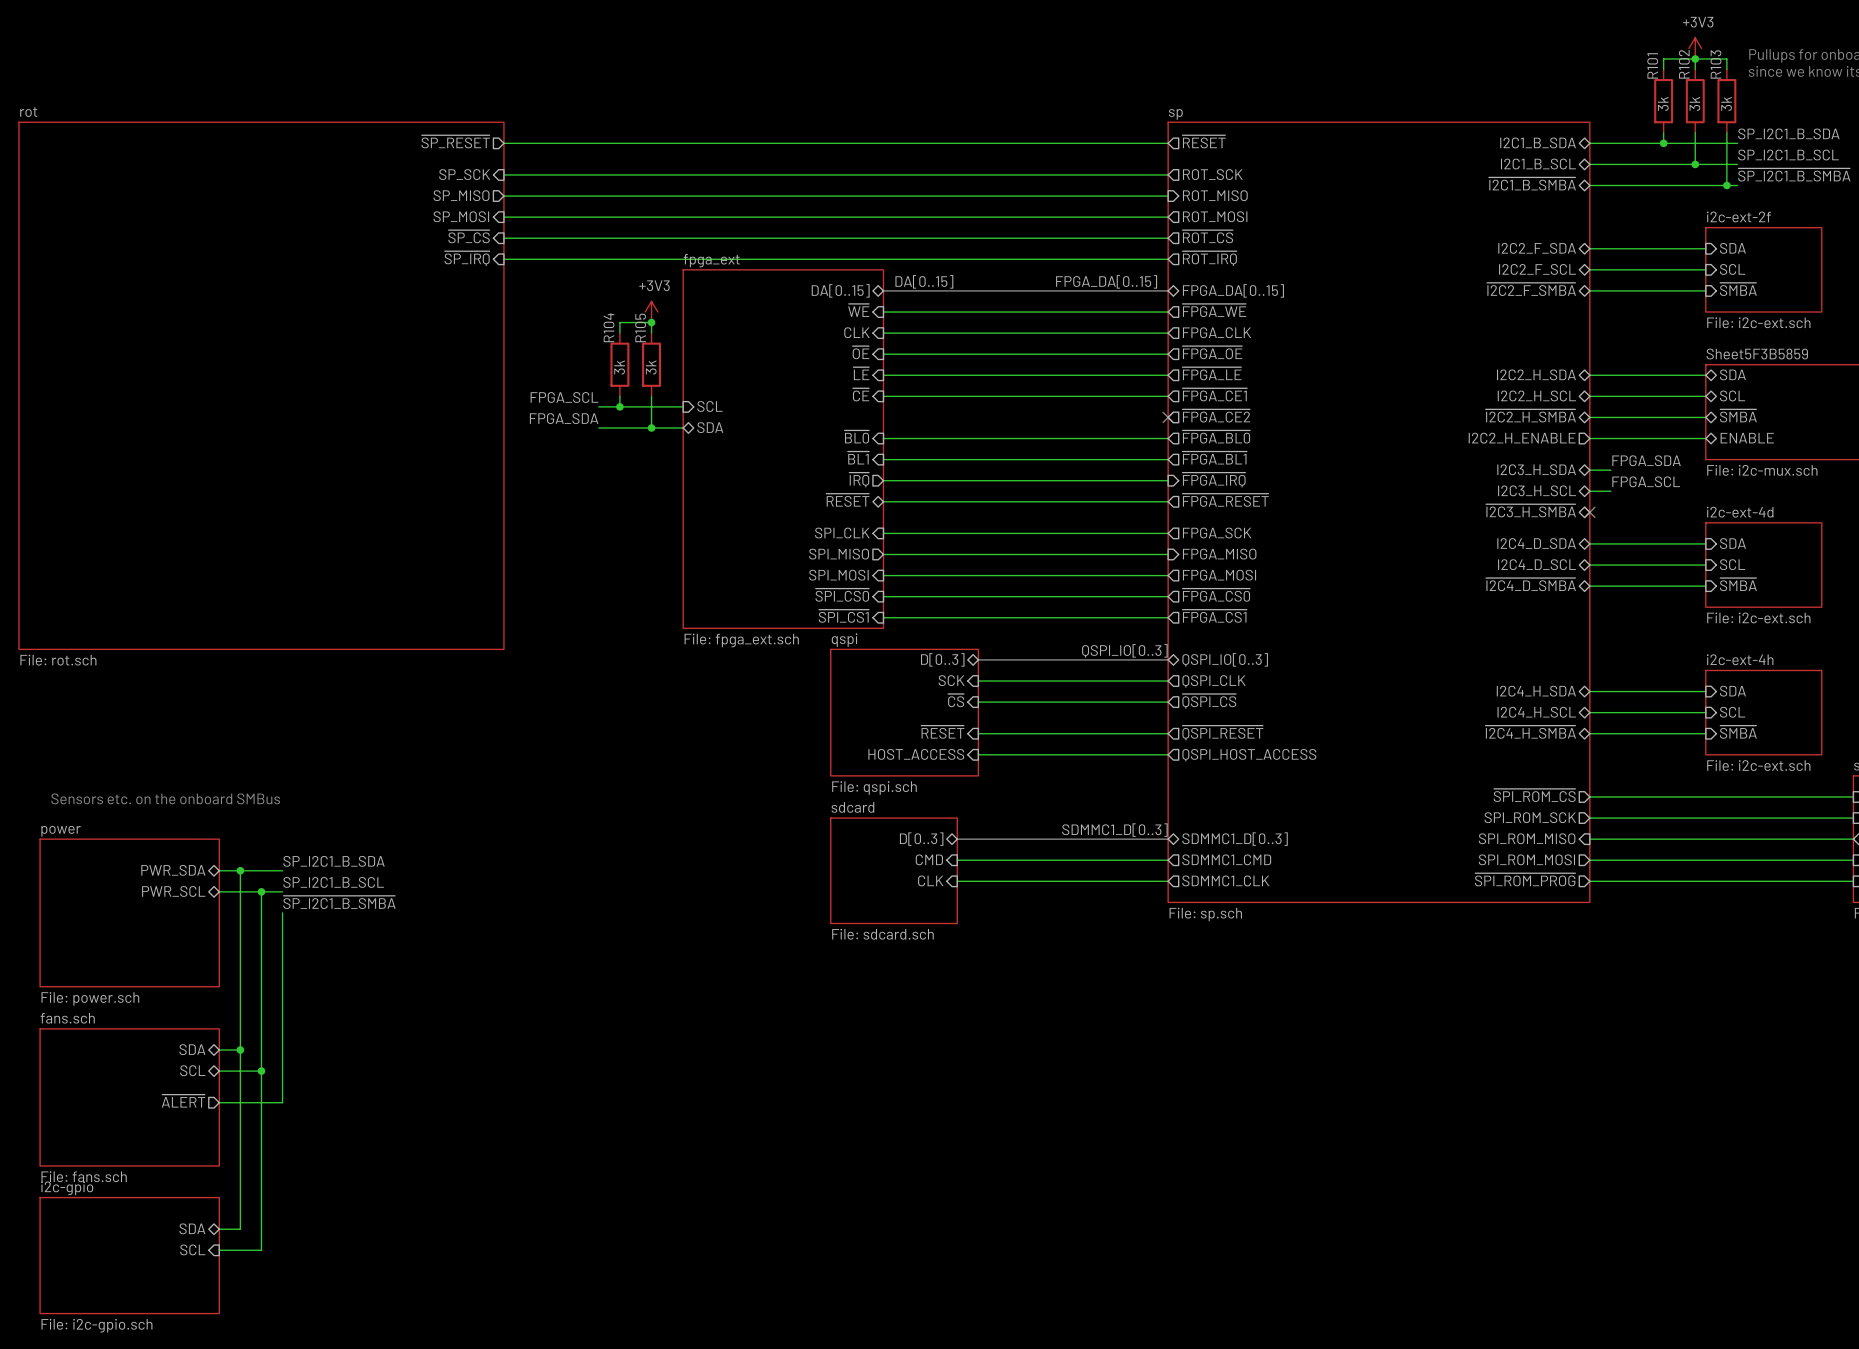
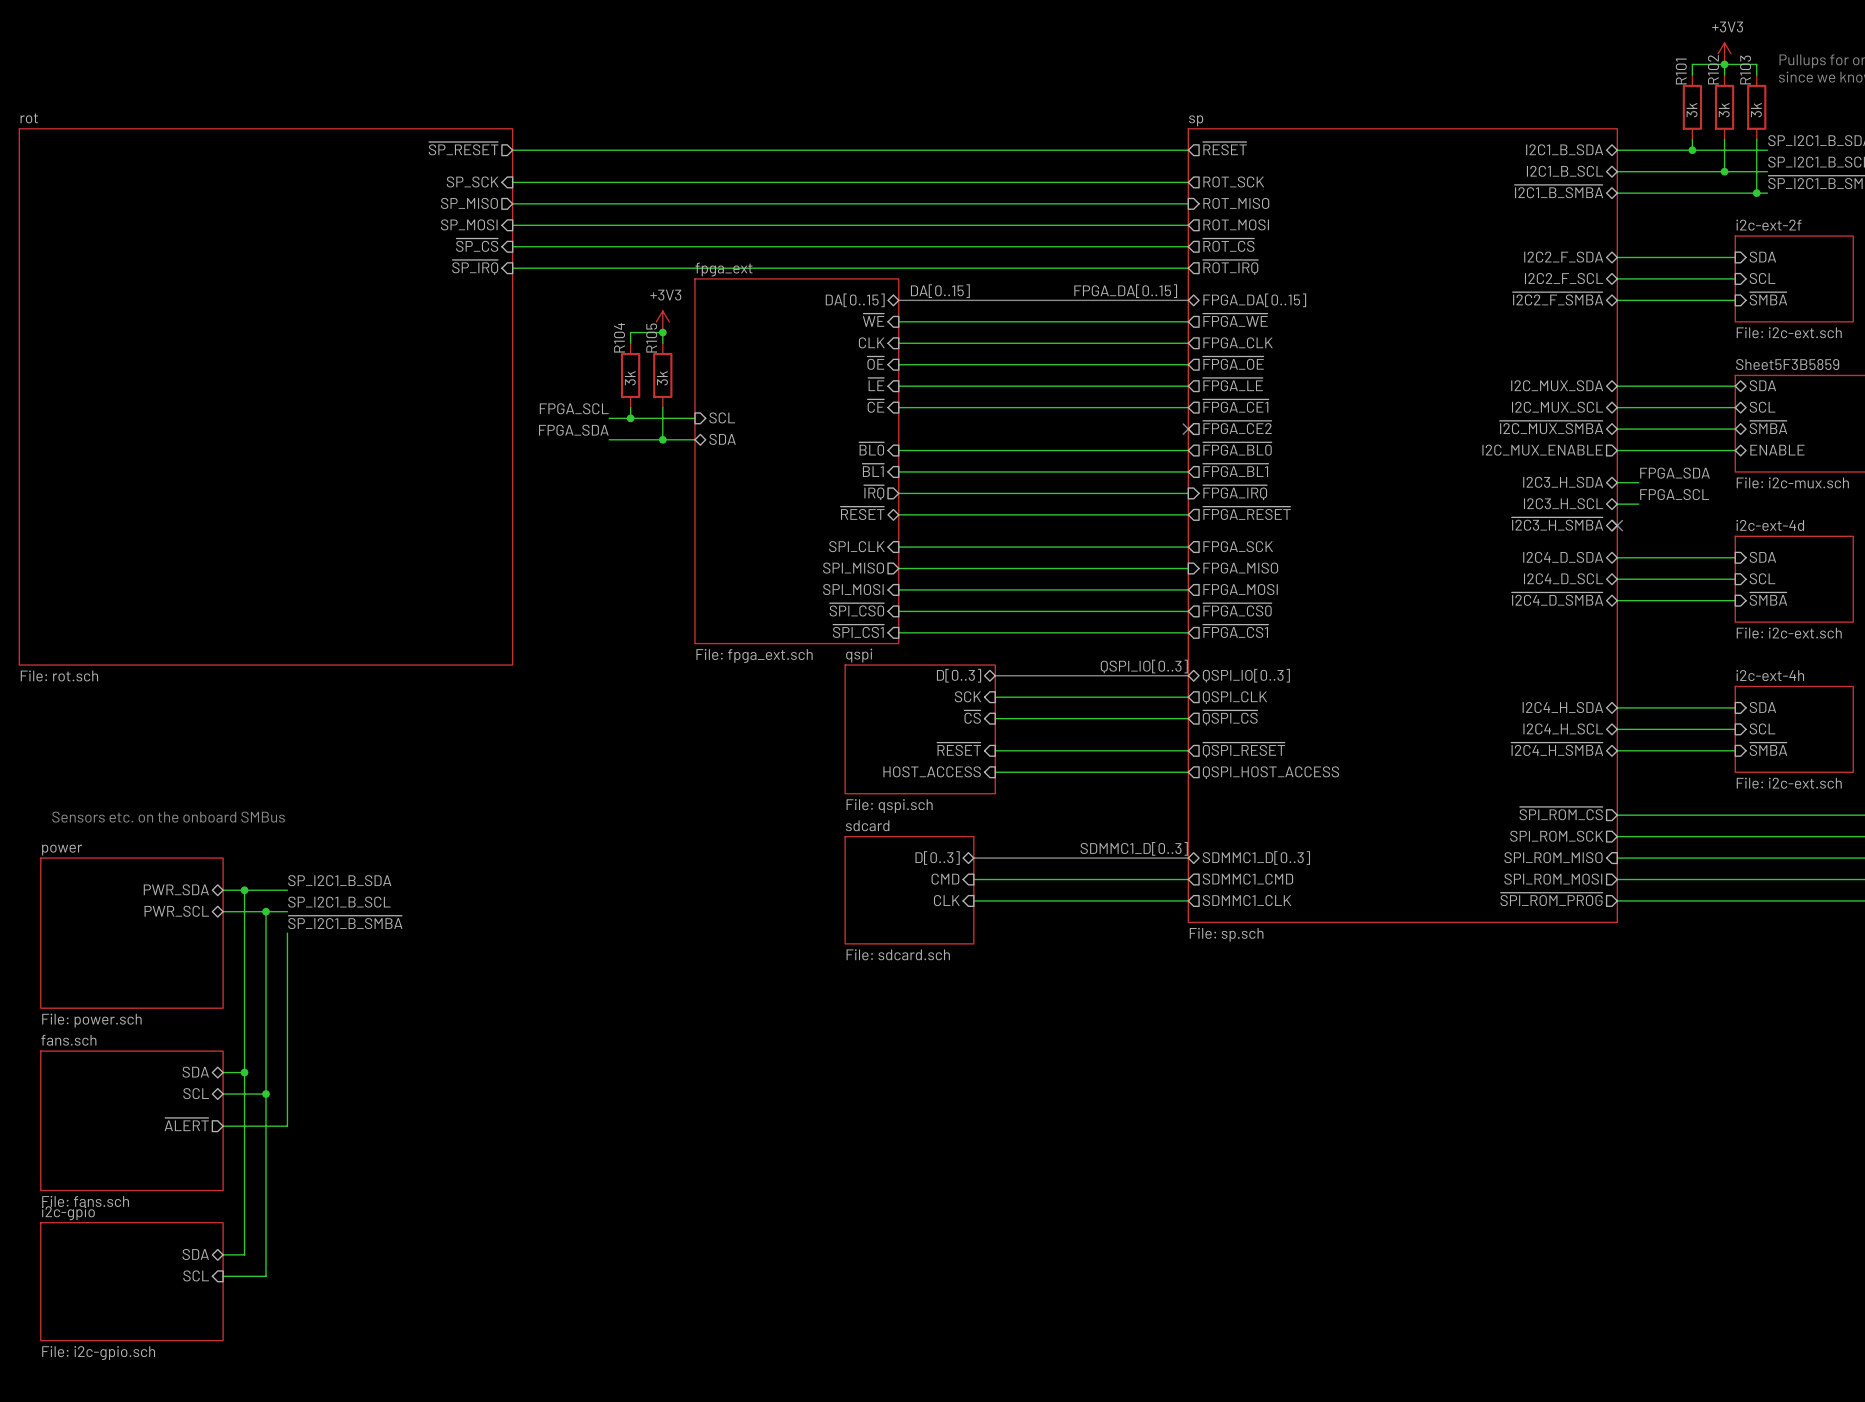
sheet pin: I2C2_H_SDA (1536, 374) -> I2C_MUX_SDA (1557, 385)
sheet pin: I2C2_H_SCL (1536, 395) -> I2C_MUX_SCL (1557, 407)
sheet pin: ~{I2C2_H_SMBA} (1530, 415) -> ~{I2C_MUX_SMBA} (1551, 427)
sheet pin: I2C2_H_ENABLE (1522, 438) -> I2C_MUX_ENABLE (1542, 450)

